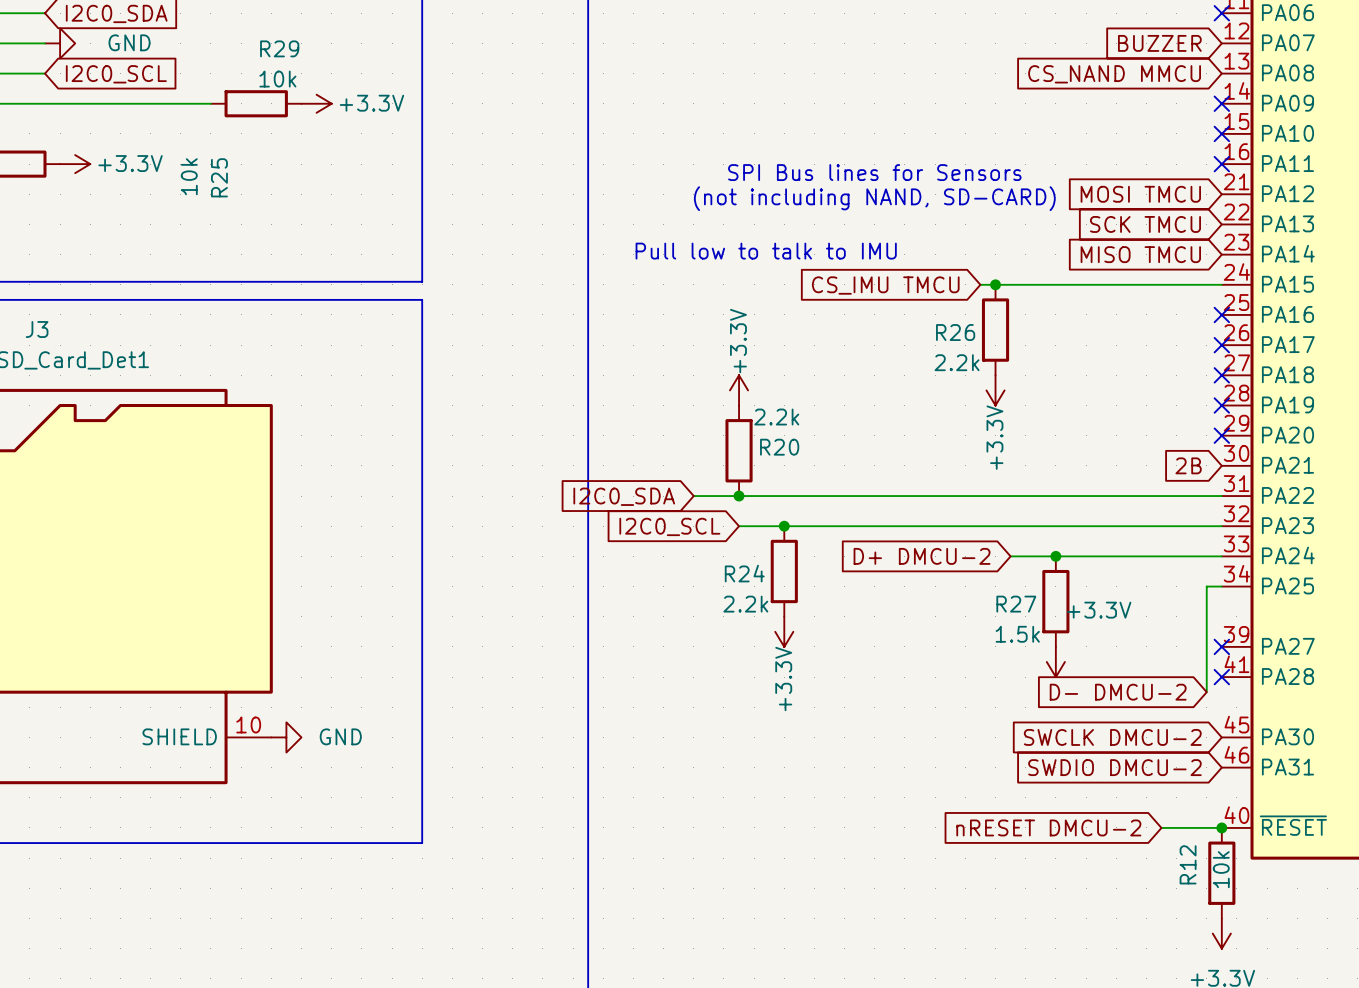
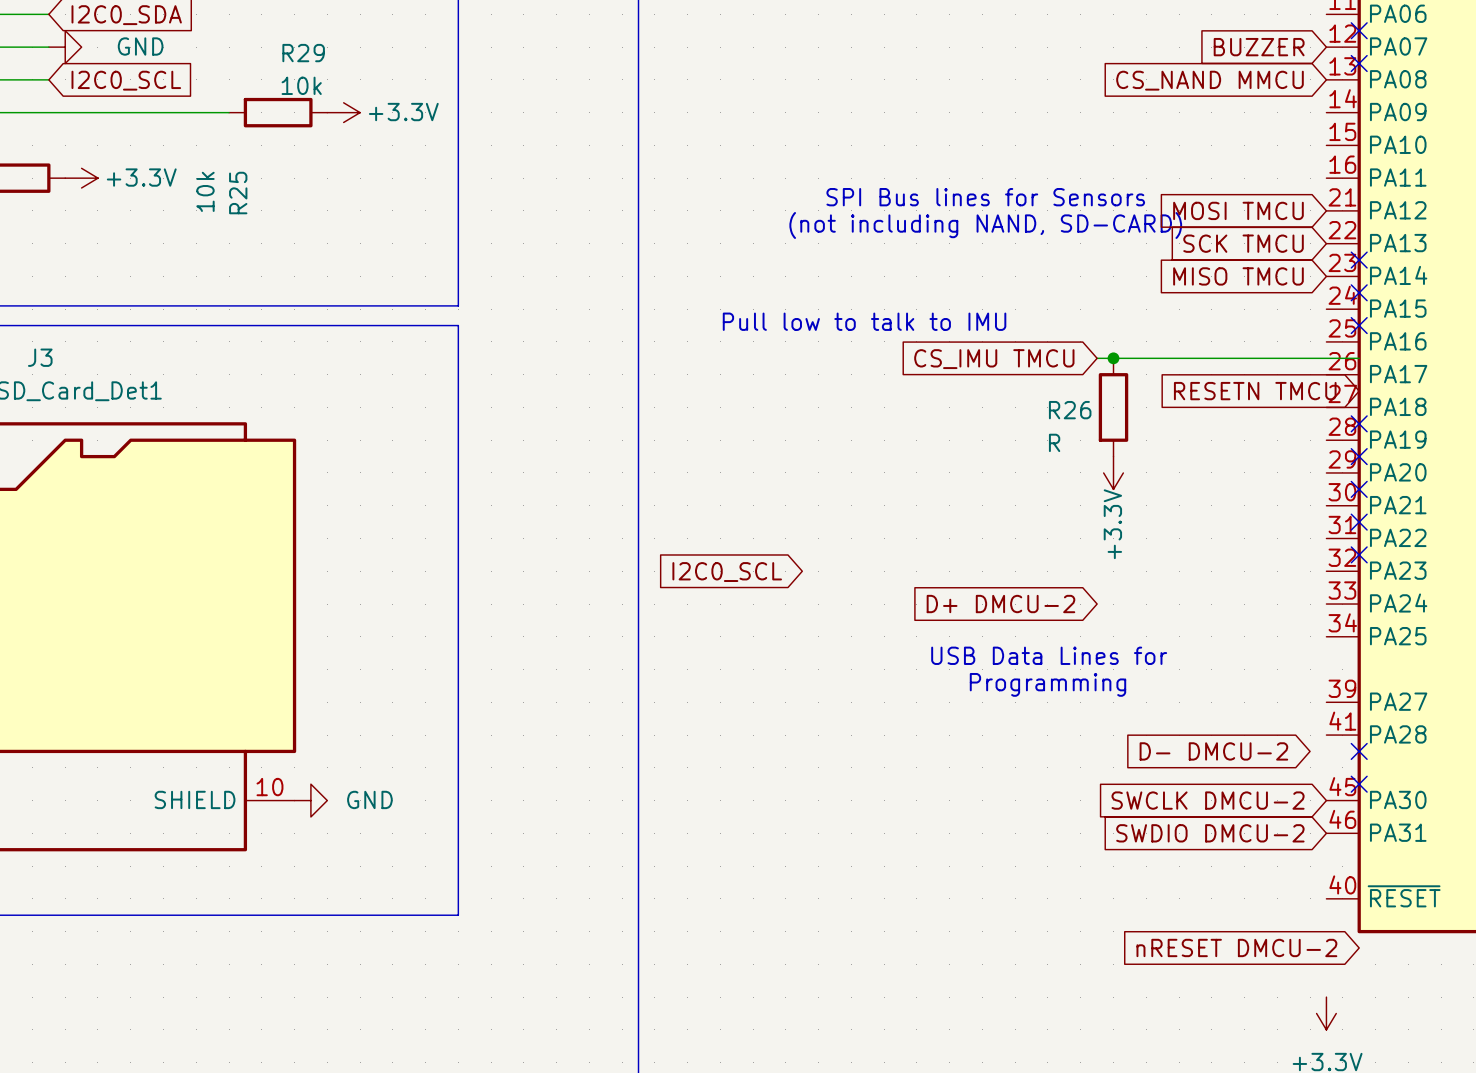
no-connect mark: (1221, 13) -> none
no-connect mark: none -> (1359, 30)
no-connect mark: none -> (1359, 63)
no-connect mark: (1221, 103) -> none
no-connect mark: (1221, 133) -> none
no-connect mark: (1221, 164) -> none
text position: SPI Bus lines for Sensors (874, 172) -> SPI Bus lines for Sensors (985, 197)
text position: (not including NAND, SD-CARD) (874, 198) -> (not including NAND, SD-CARD) (985, 225)
no-connect mark: none -> (1359, 260)
text position: Pull low to talk to IMU (766, 251) -> Pull low to talk to IMU (864, 321)
no-connect mark: none -> (1359, 292)
wire: (980, 284) (1221, 284) -> (1097, 358) (1359, 358)
junction position: (995, 284) -> (1113, 358)
global label position: CS_IMU TMCU (885, 285) -> CS_IMU TMCU (994, 359)
no-connect mark: none -> (1359, 325)
no-connect mark: (1221, 314) -> none
R26 position: (995, 330) -> (1113, 407)
no-connect mark: (1221, 345) -> none
global label: none -> RESETN TMCU (1255, 391)
R26 value: 2.2k (957, 362) -> R (1054, 442)
no-connect mark: (1221, 375) -> none
power symbol: +3.3V (739, 390) -> none
power symbol position: +3.3V (995, 390) -> +3.3V (1113, 472)
no-connect mark: none -> (1359, 423)
no-connect mark: (1221, 405) -> none
no-connect mark: none -> (1359, 456)
no-connect mark: (1221, 435) -> none
R20: 2.2k (739, 450) -> none
no-connect mark: none -> (1359, 489)
global label: 2B (1188, 465) -> none
no-connect mark: none -> (1359, 522)
global label: I2C0_SDA (624, 496) -> none
wire: (693, 496) (1221, 496) -> none
junction: (739, 496) -> none
no-connect mark: none -> (1359, 554)
wire: (739, 526) (1221, 526) -> none
junction: (784, 526) -> none
wire: (1010, 556) (1221, 556) -> none
junction: (1055, 556) -> none
R24: 2.2k (784, 571) -> none
wire: (1221, 586) (1206, 586) (1206, 692) -> none
R27: 1.5k (1055, 601) -> none
text: none -> USB Data Lines for (1049, 655)
text: none -> Programming (1047, 684)
power symbol: +3.3V (784, 631) -> none
no-connect mark: (1221, 646) -> none
power symbol: +3.3V (1055, 662) -> none
no-connect mark: (1221, 677) -> none
no-connect mark: none -> (1359, 751)
no-connect mark: none -> (1359, 784)
global label position: nRESET DMCU-2 (1048, 827) -> nRESET DMCU-2 (1236, 947)
wire: (1161, 827) (1221, 827) -> none
junction: (1221, 827) -> none
R12: 10k (1221, 873) -> none

